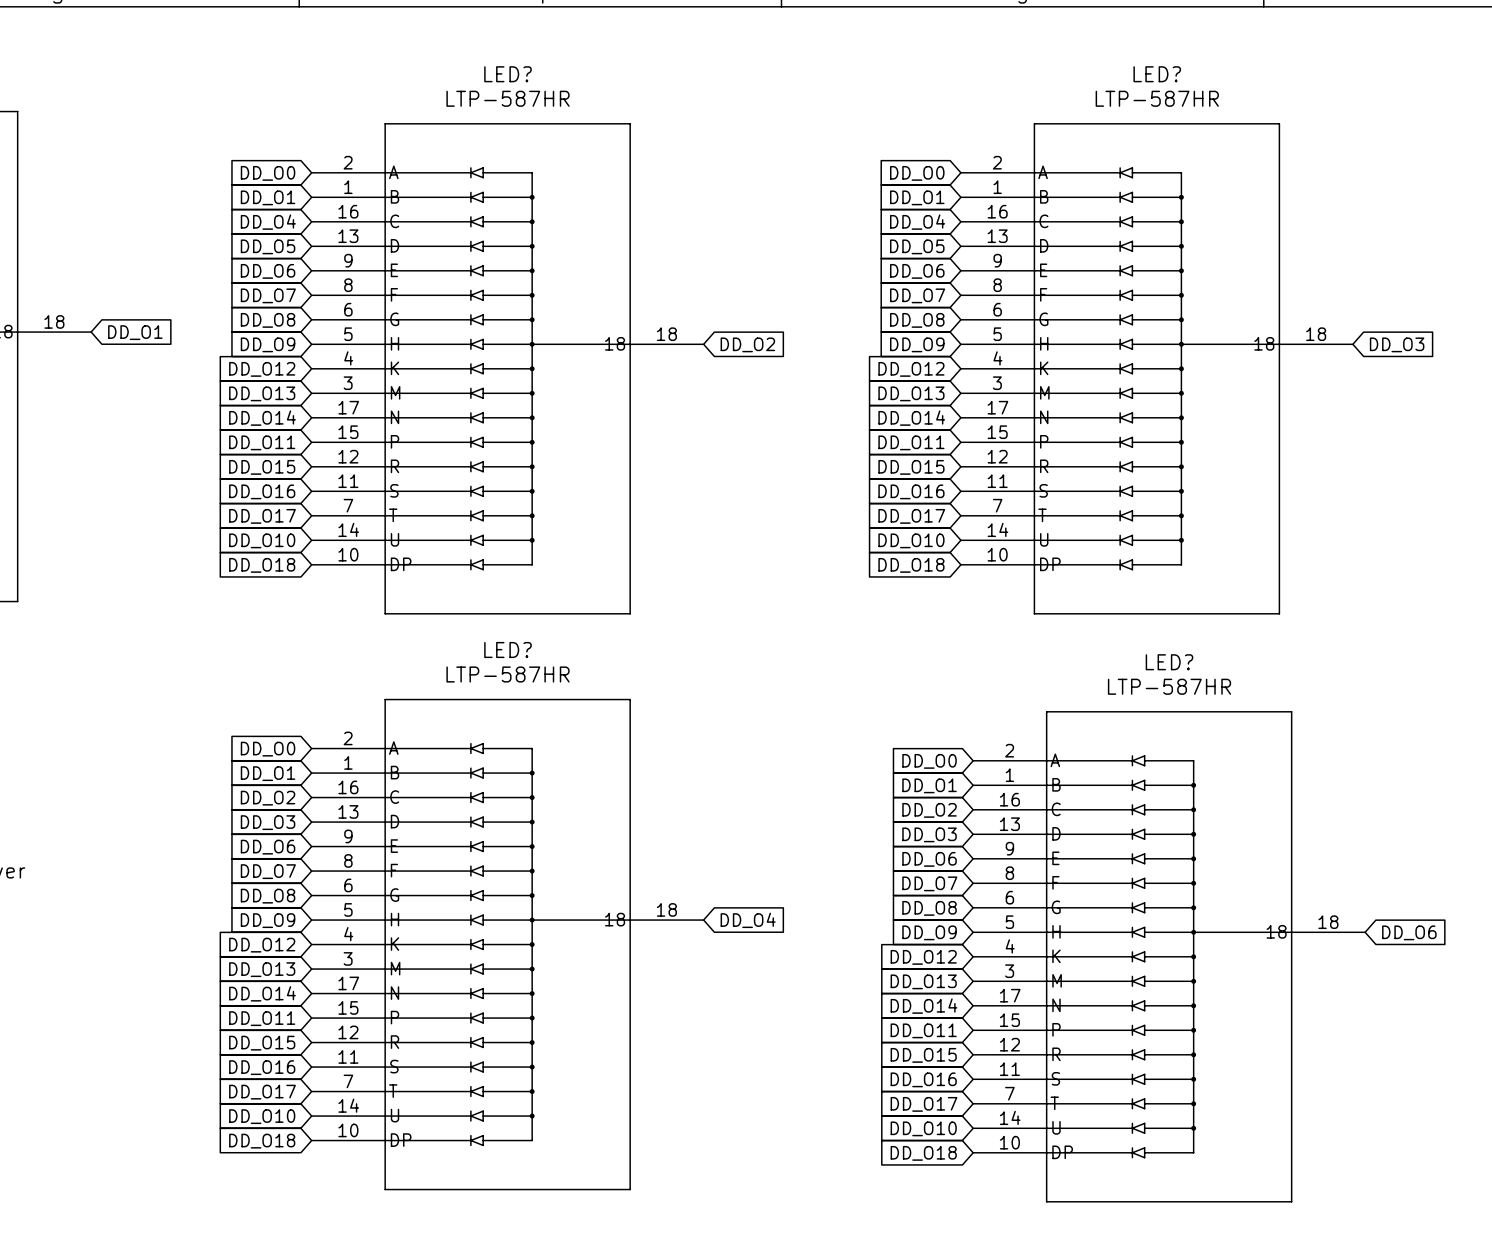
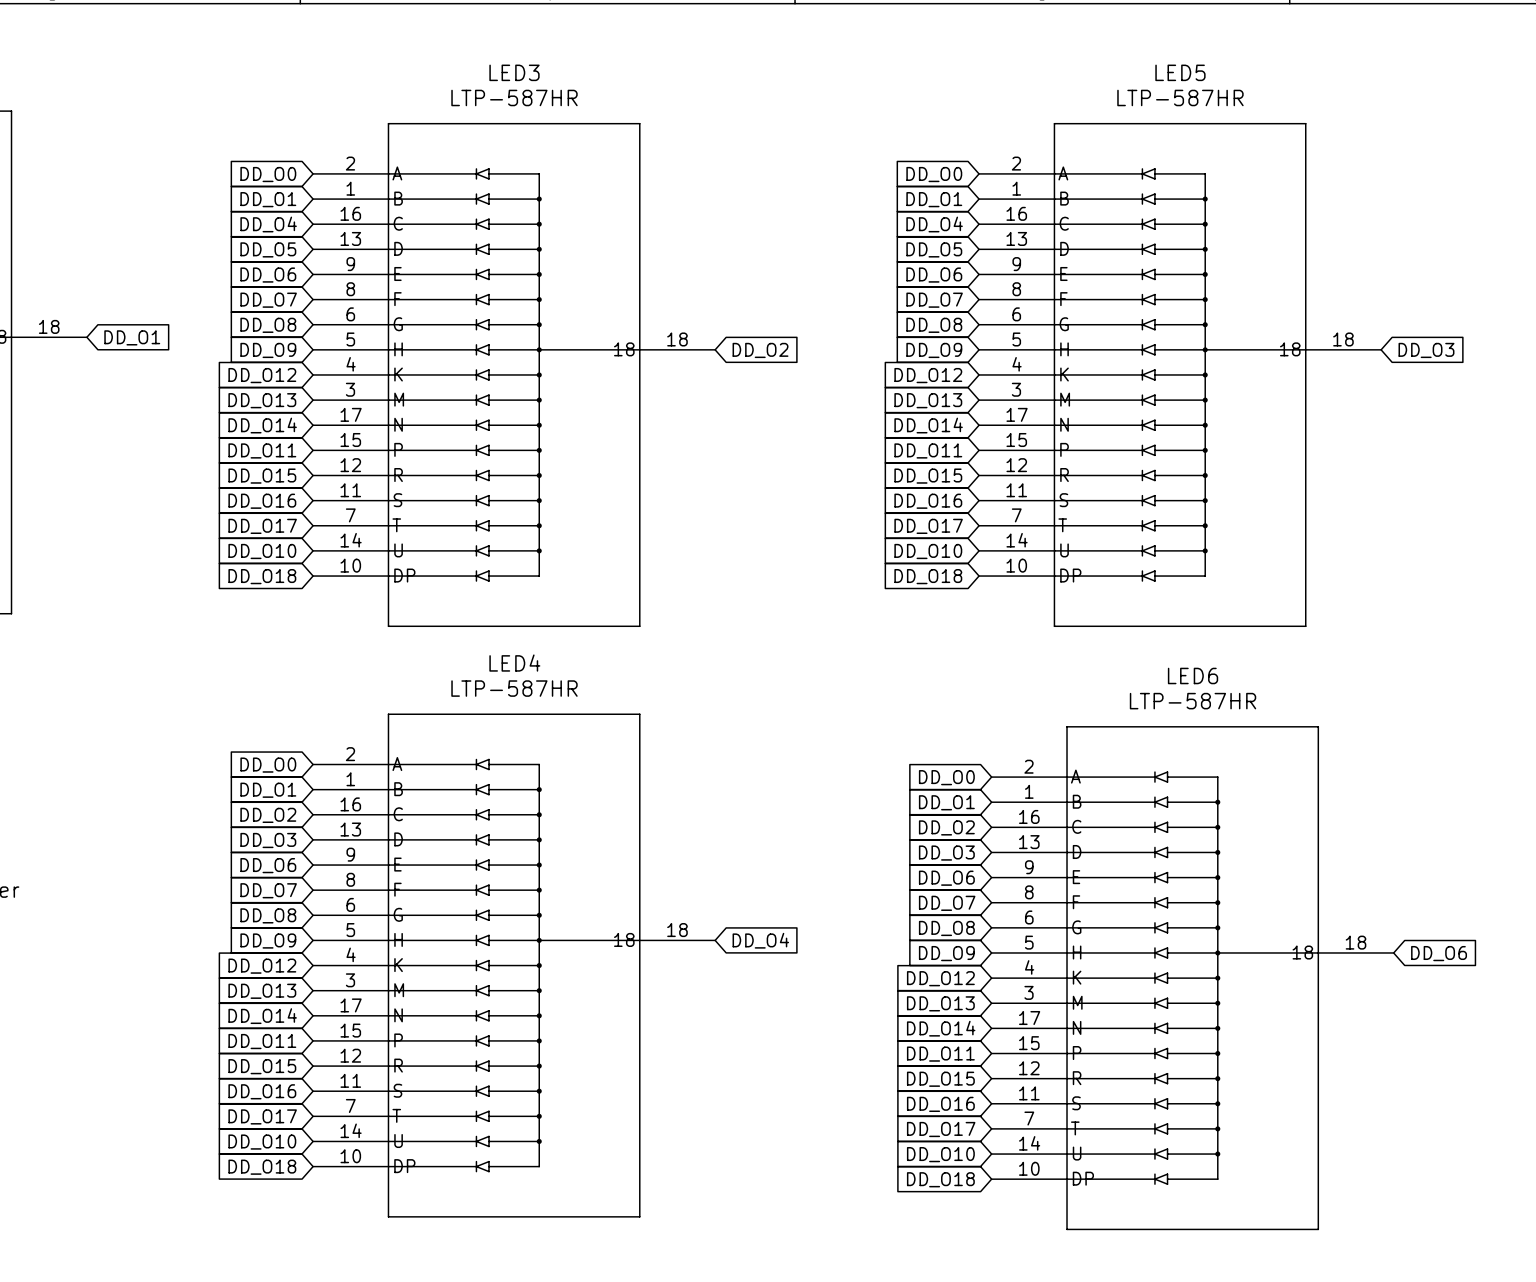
LED? name: LED? (508, 74) -> LED3 (514, 72)
LED? name: LED? (1157, 74) -> LED5 (1180, 72)
LED? name: LED? (508, 650) -> LED4 (514, 663)
LED? name: LED? (1169, 662) -> LED6 (1193, 675)

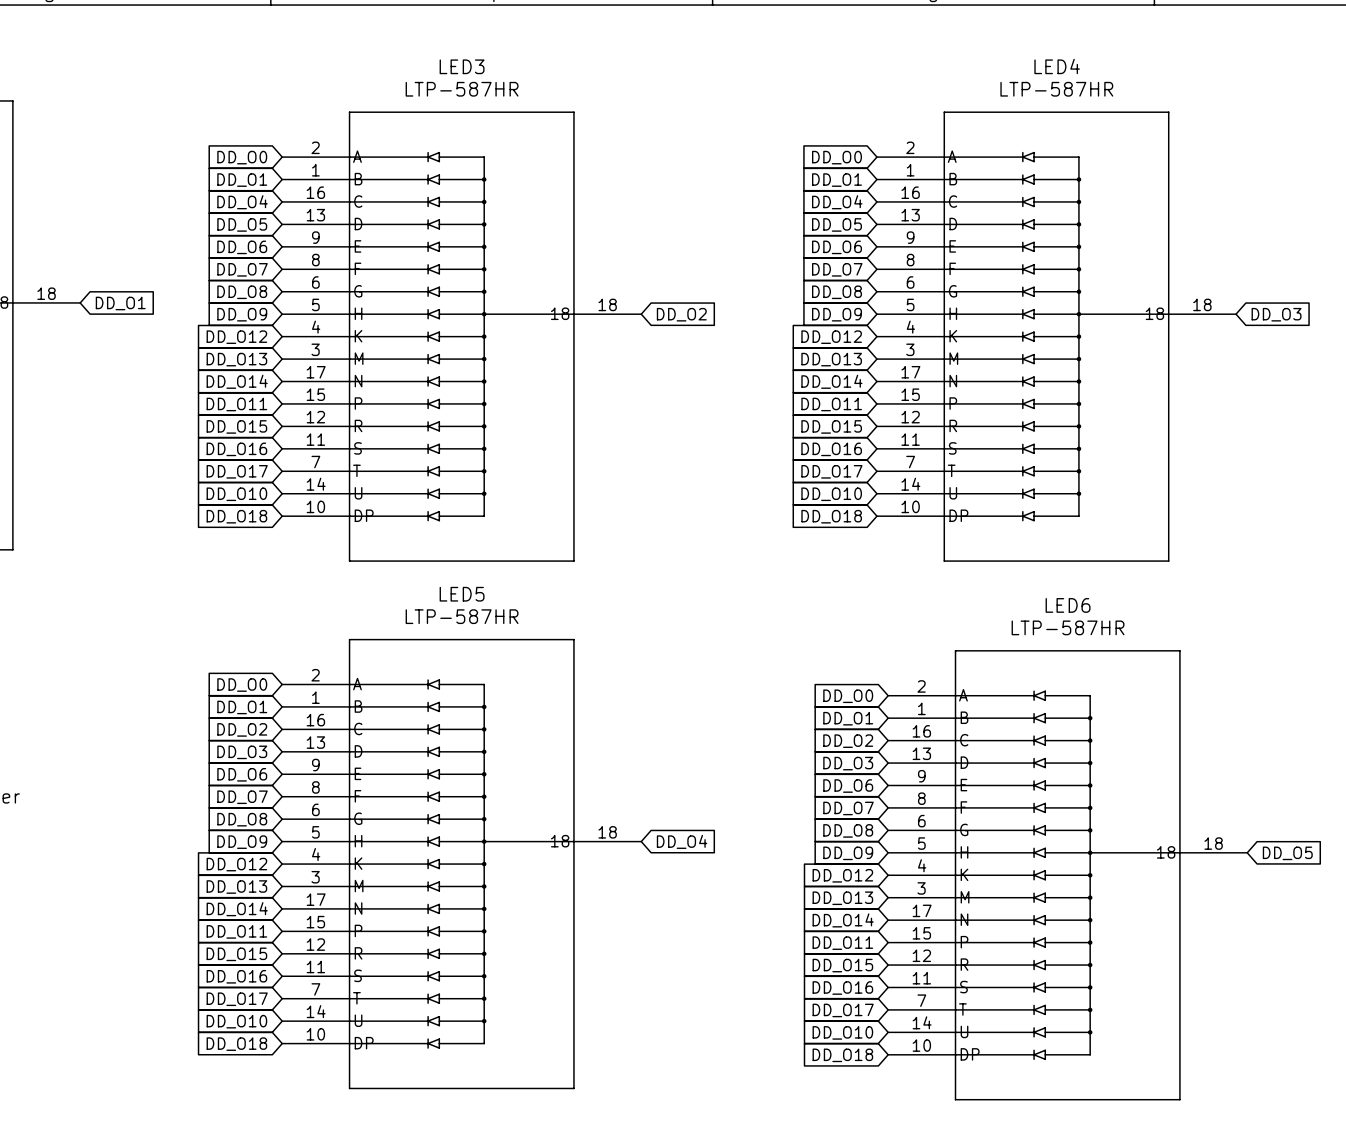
LED5 name: LED5 (1180, 72) -> LED4 (1057, 66)
LED4 name: LED4 (514, 663) -> LED5 (462, 594)
global label: DD_O6 (1439, 953) -> DD_O5 (1287, 853)

